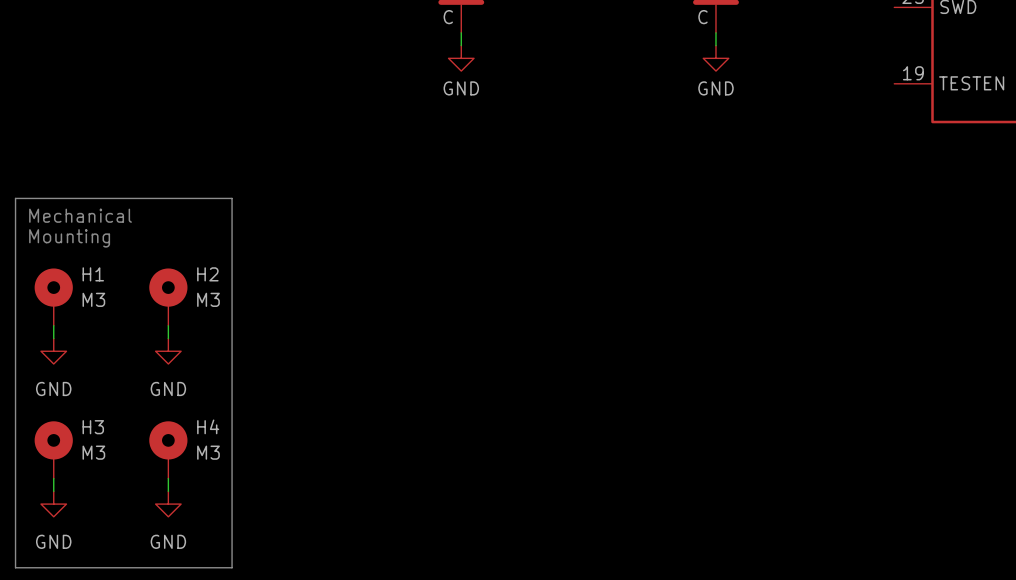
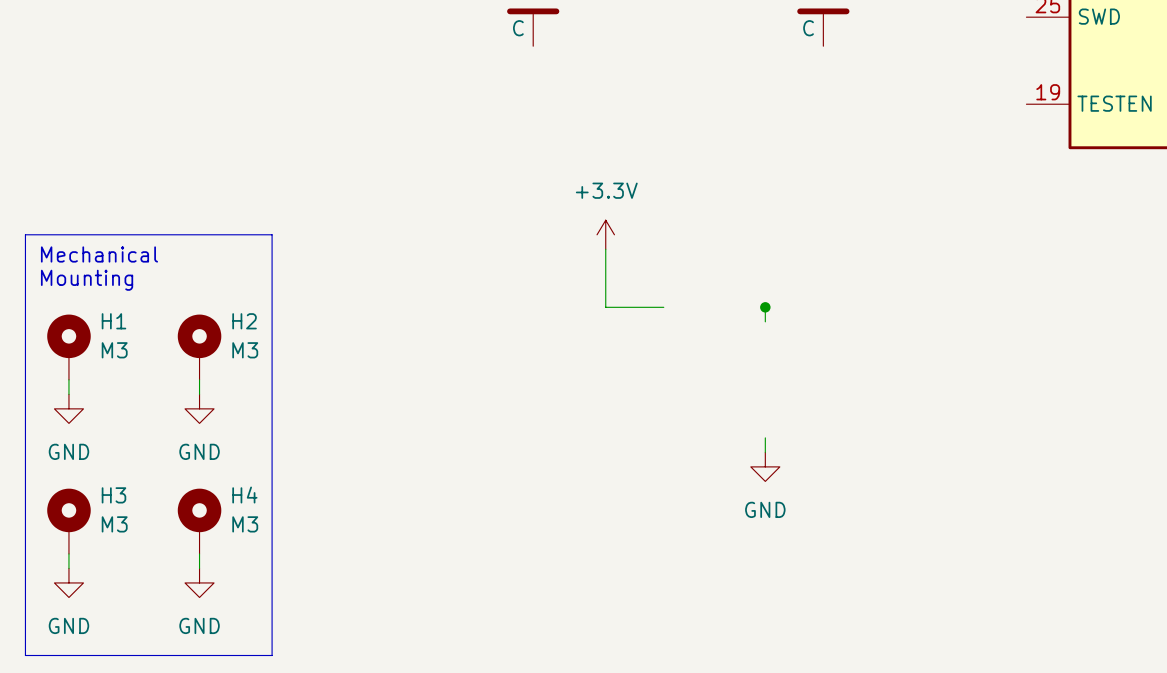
wire: (461, 32) (461, 45) -> none
wire: (715, 32) (715, 45) -> (765, 307) (765, 321)
power symbol: GND (461, 58) -> none
power symbol: GND (715, 58) -> none
power symbol: none -> +3.3V (605, 234)
wire: none -> (605, 249) (605, 307) (663, 307)
junction: none -> (765, 307)
wire: none -> (765, 437) (765, 452)
power symbol: none -> GND (765, 466)

